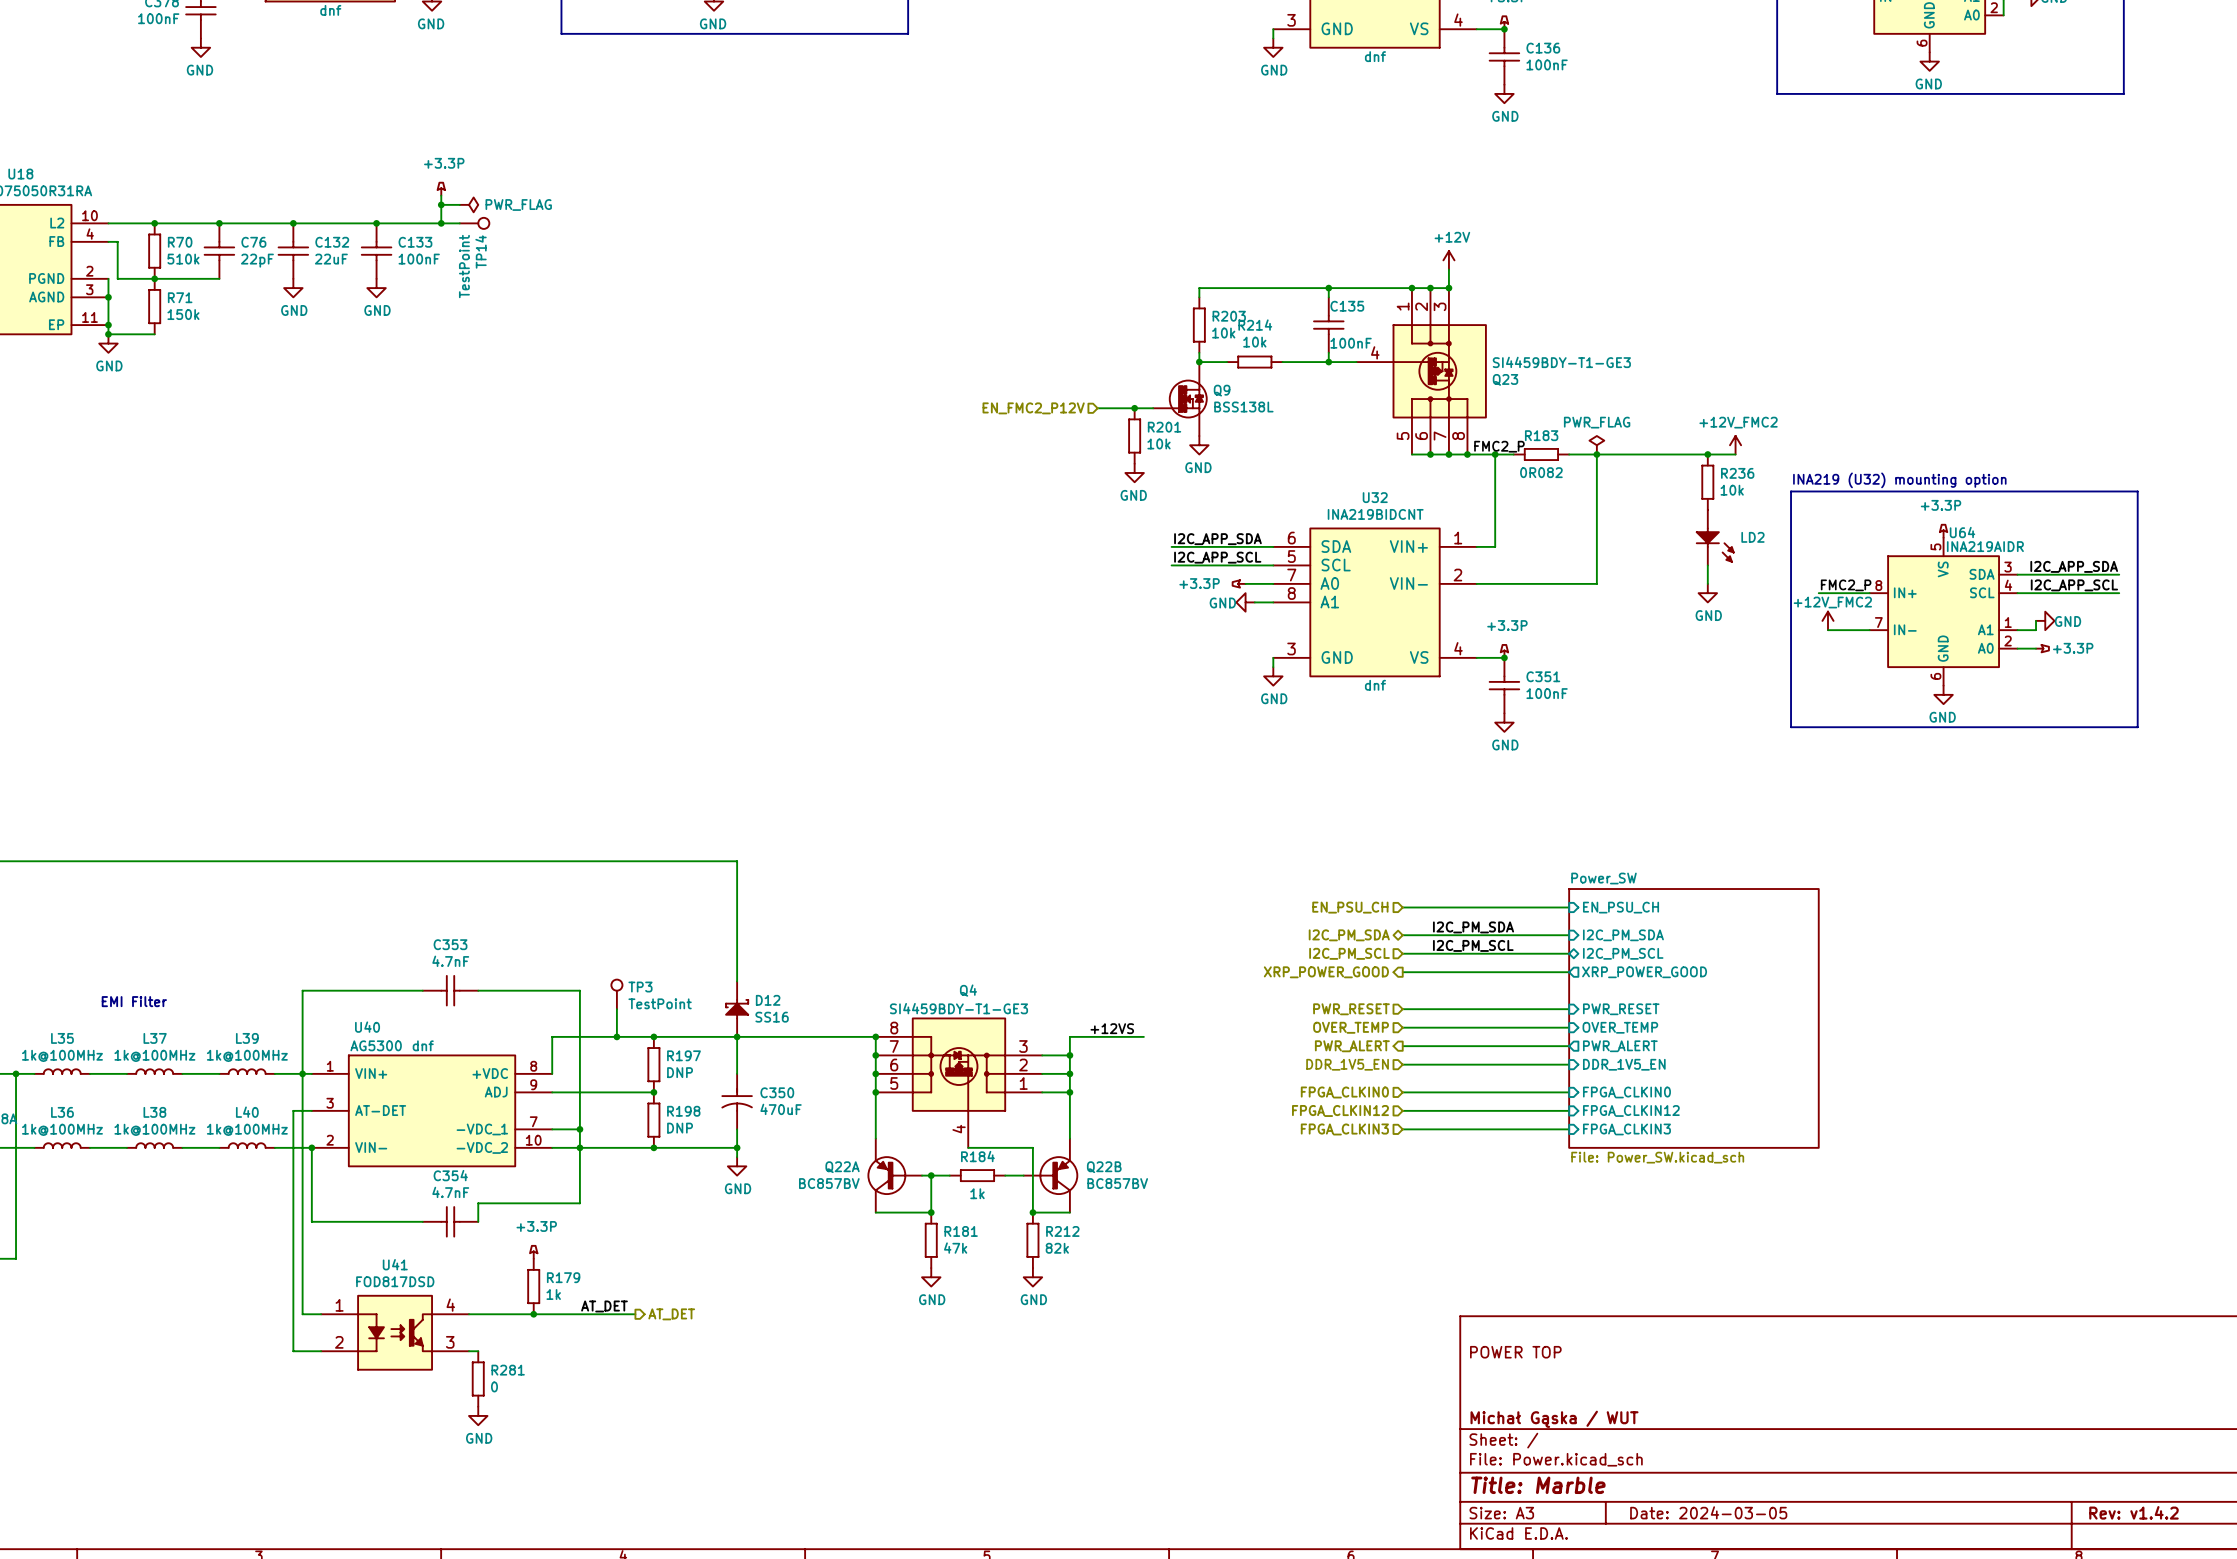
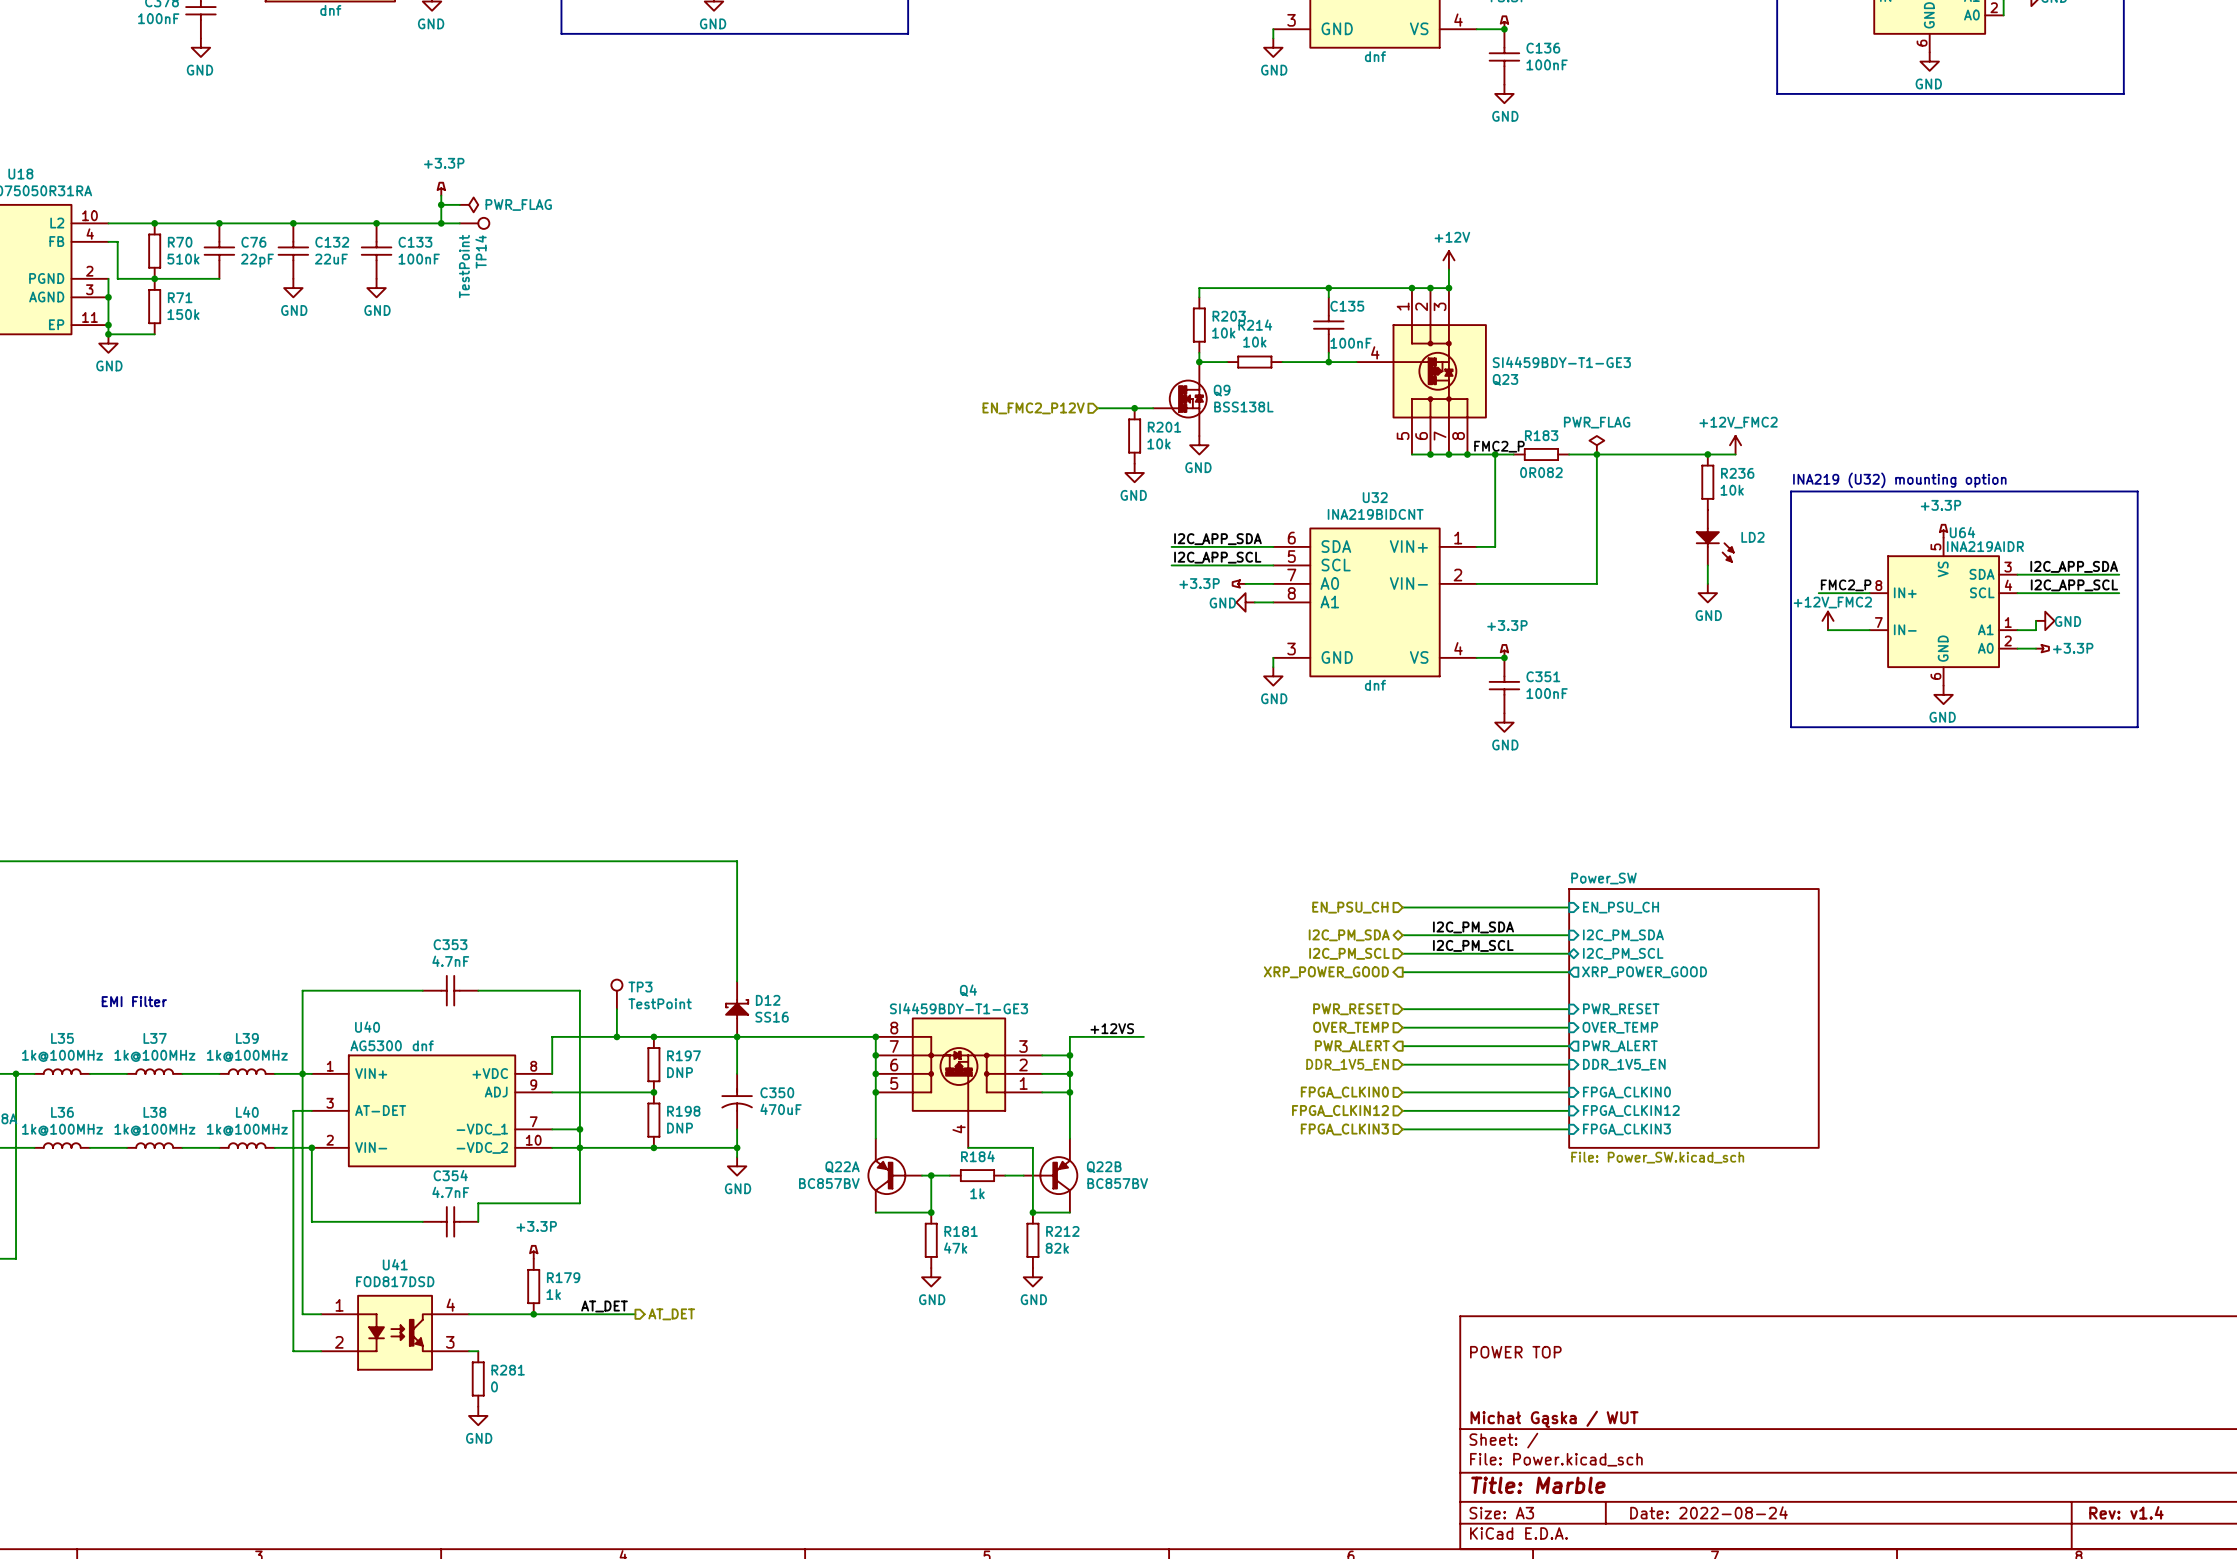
title block: Date: 2024-03-05 (1708, 1512) -> Date: 2022-08-24 (1708, 1512)
title block: Rev: v1.4.2 (2133, 1512) -> Rev: v1.4 (2126, 1512)

